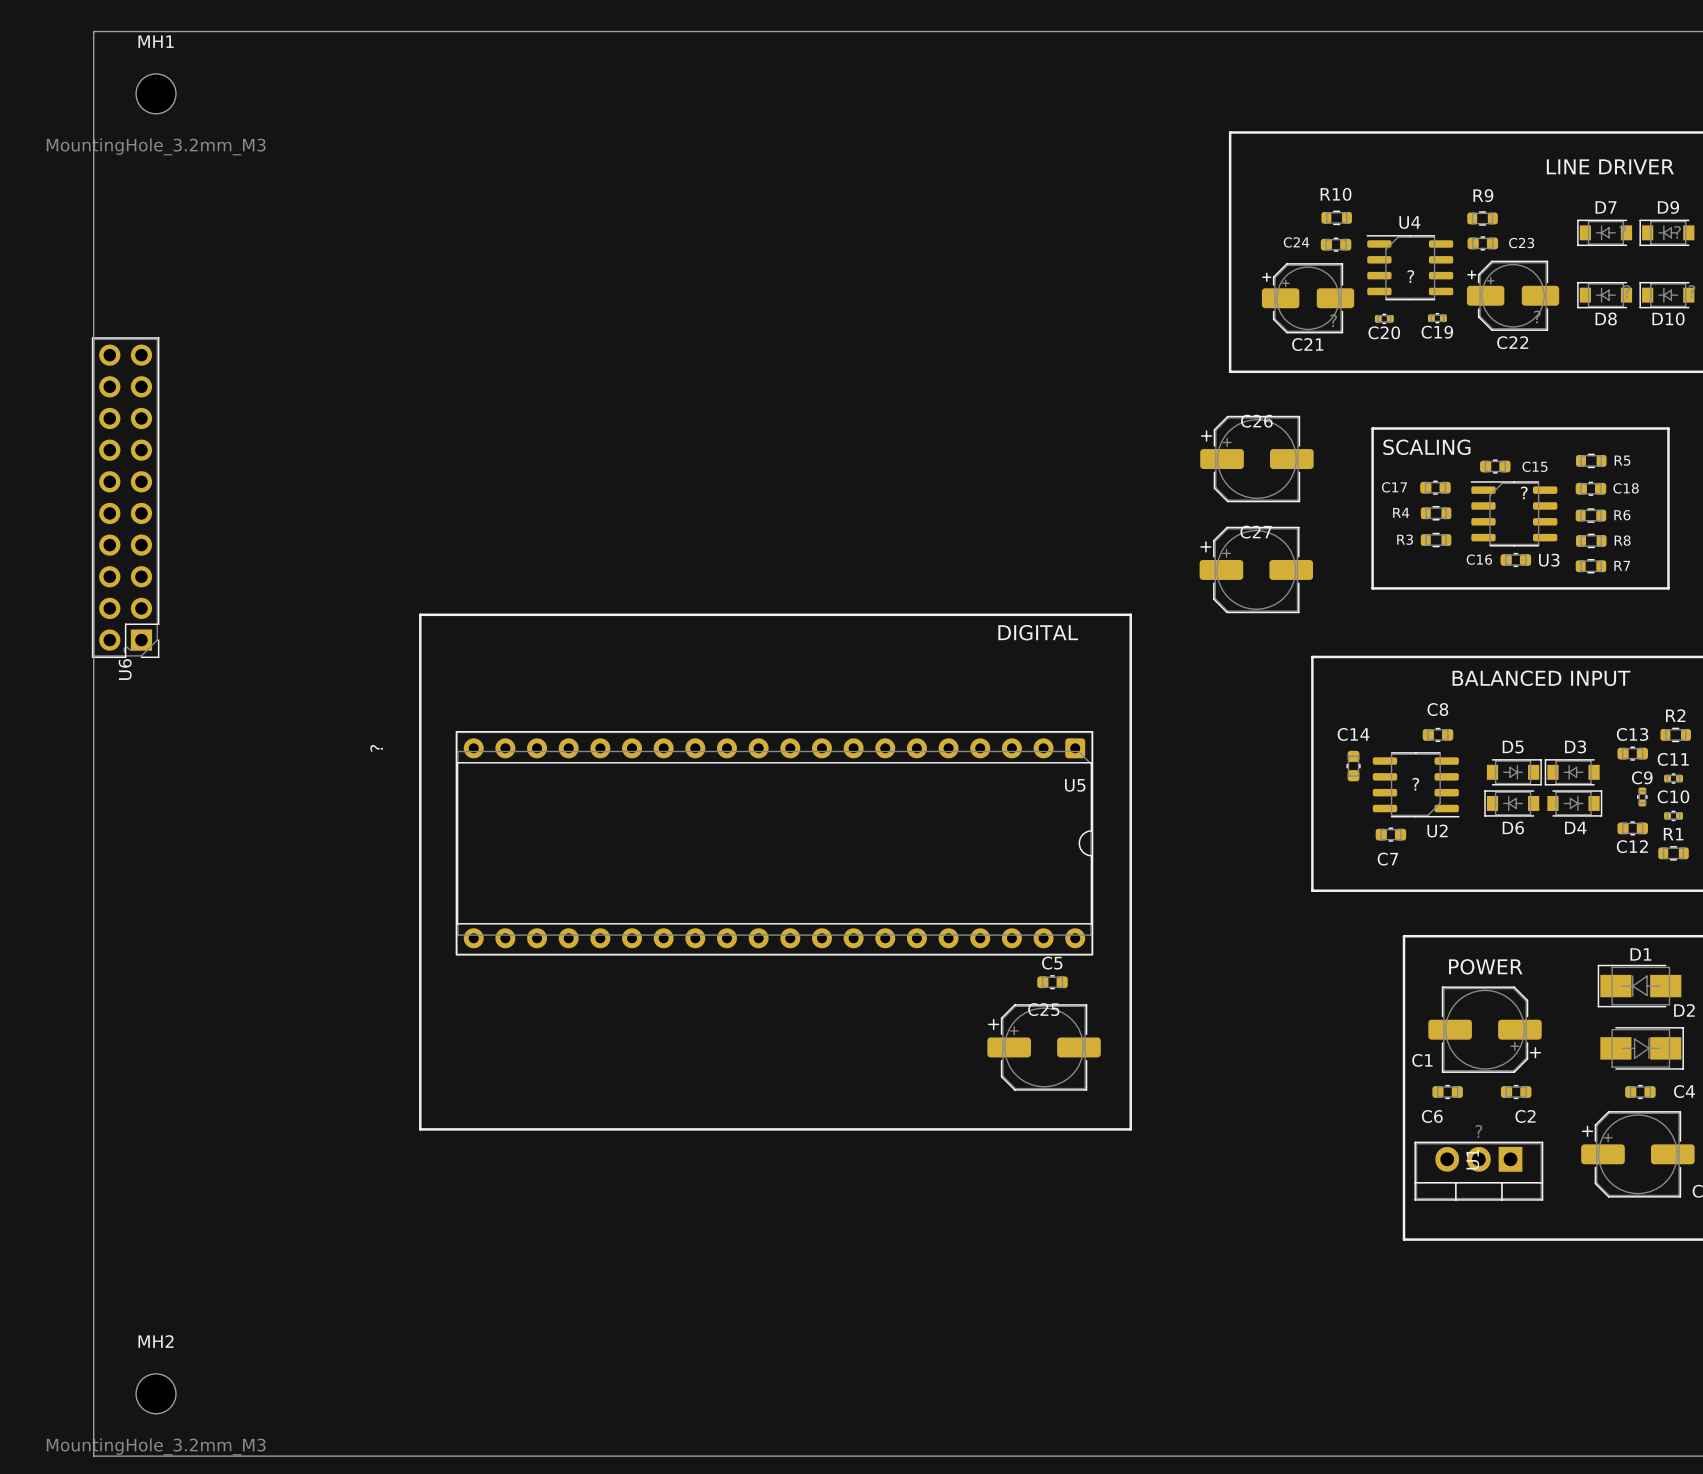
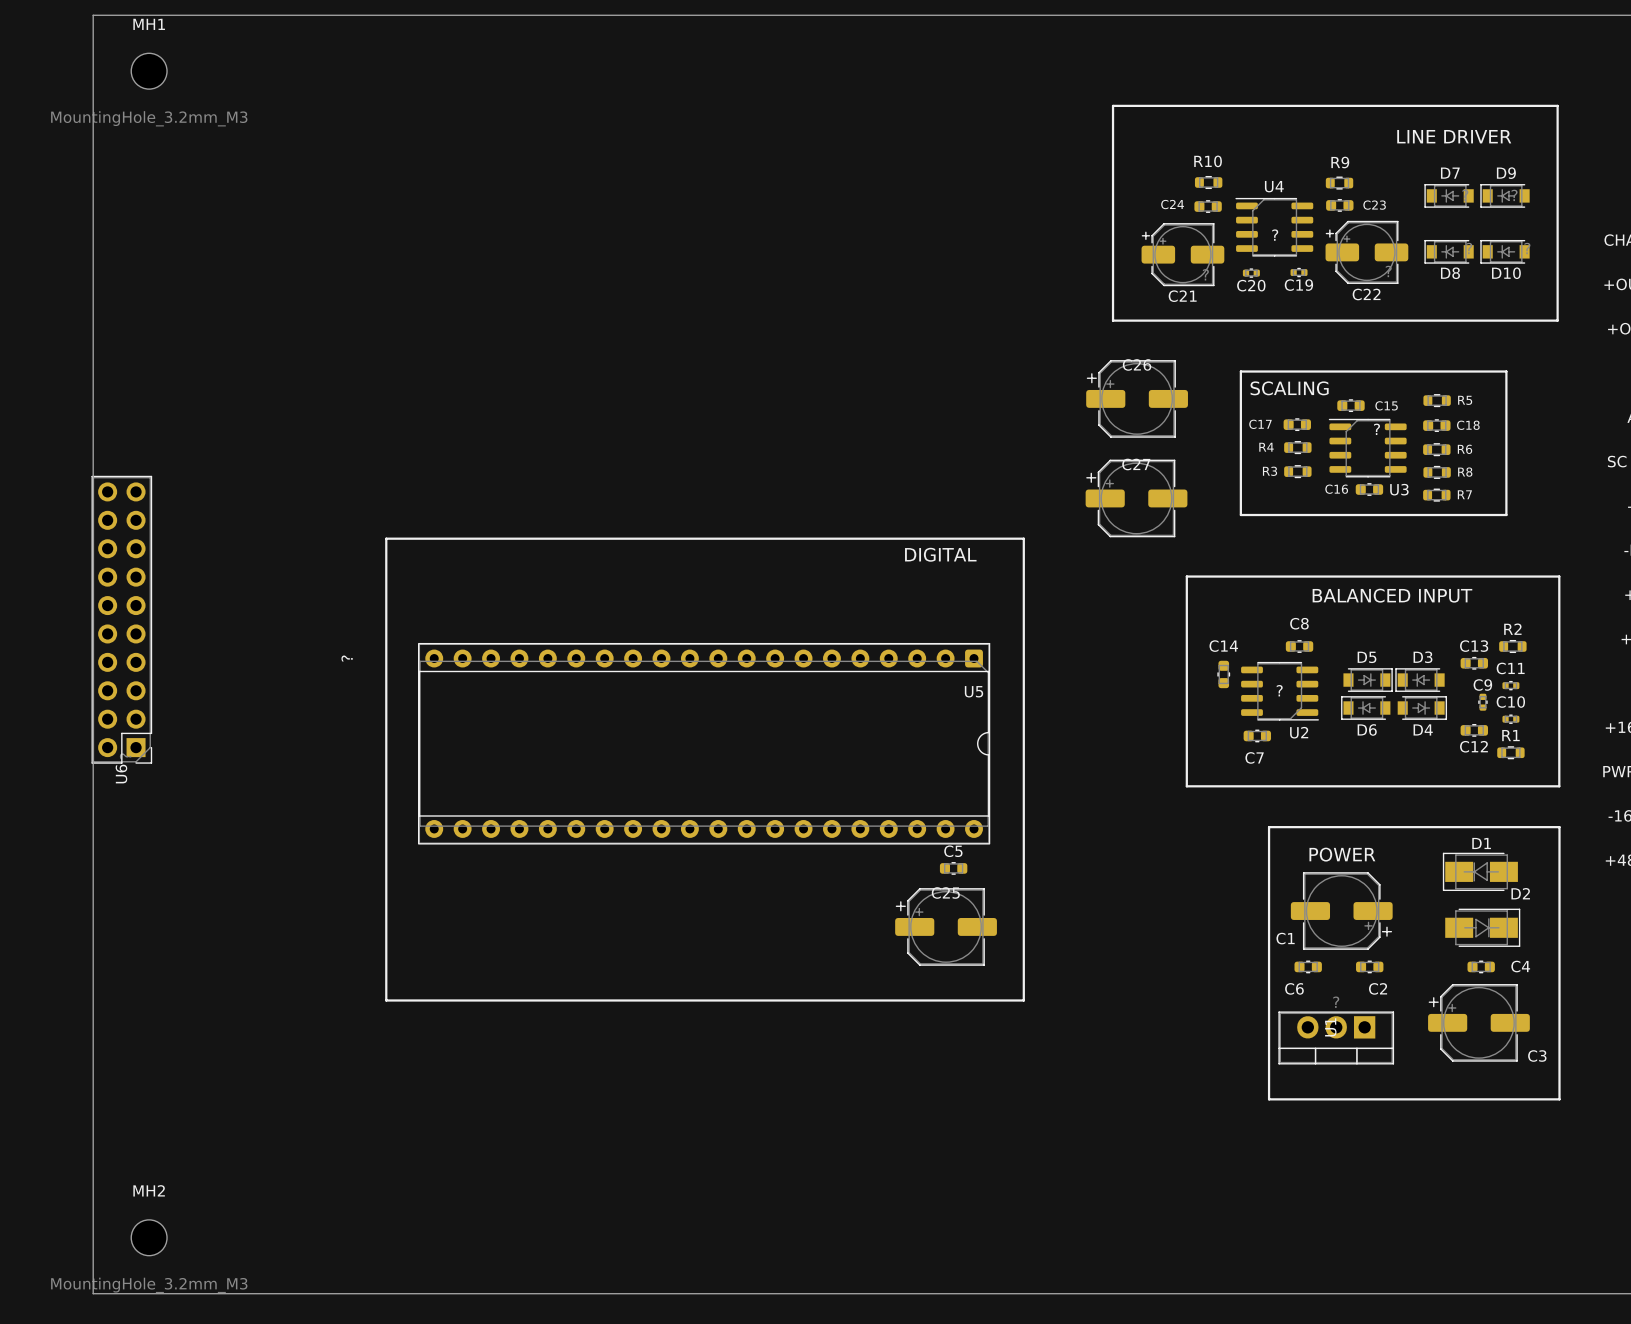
U6 position: (125, 497) -> (121, 619)

